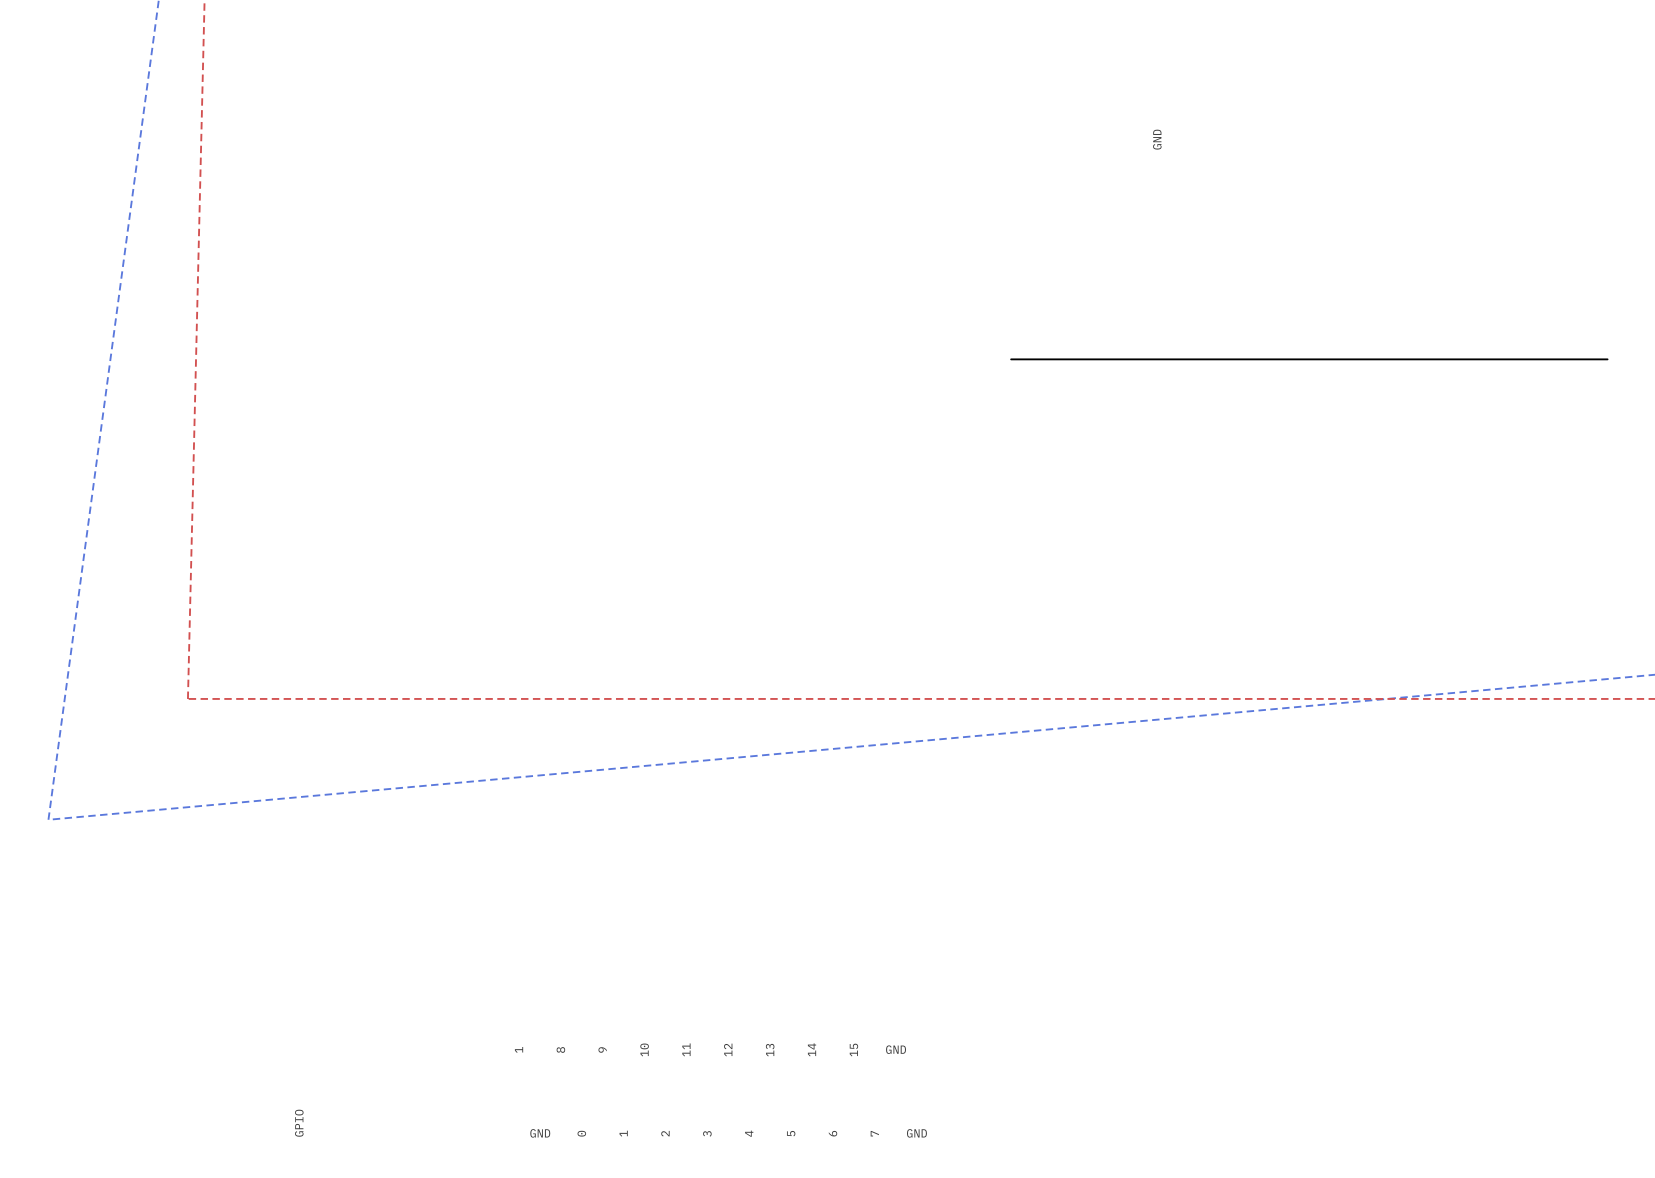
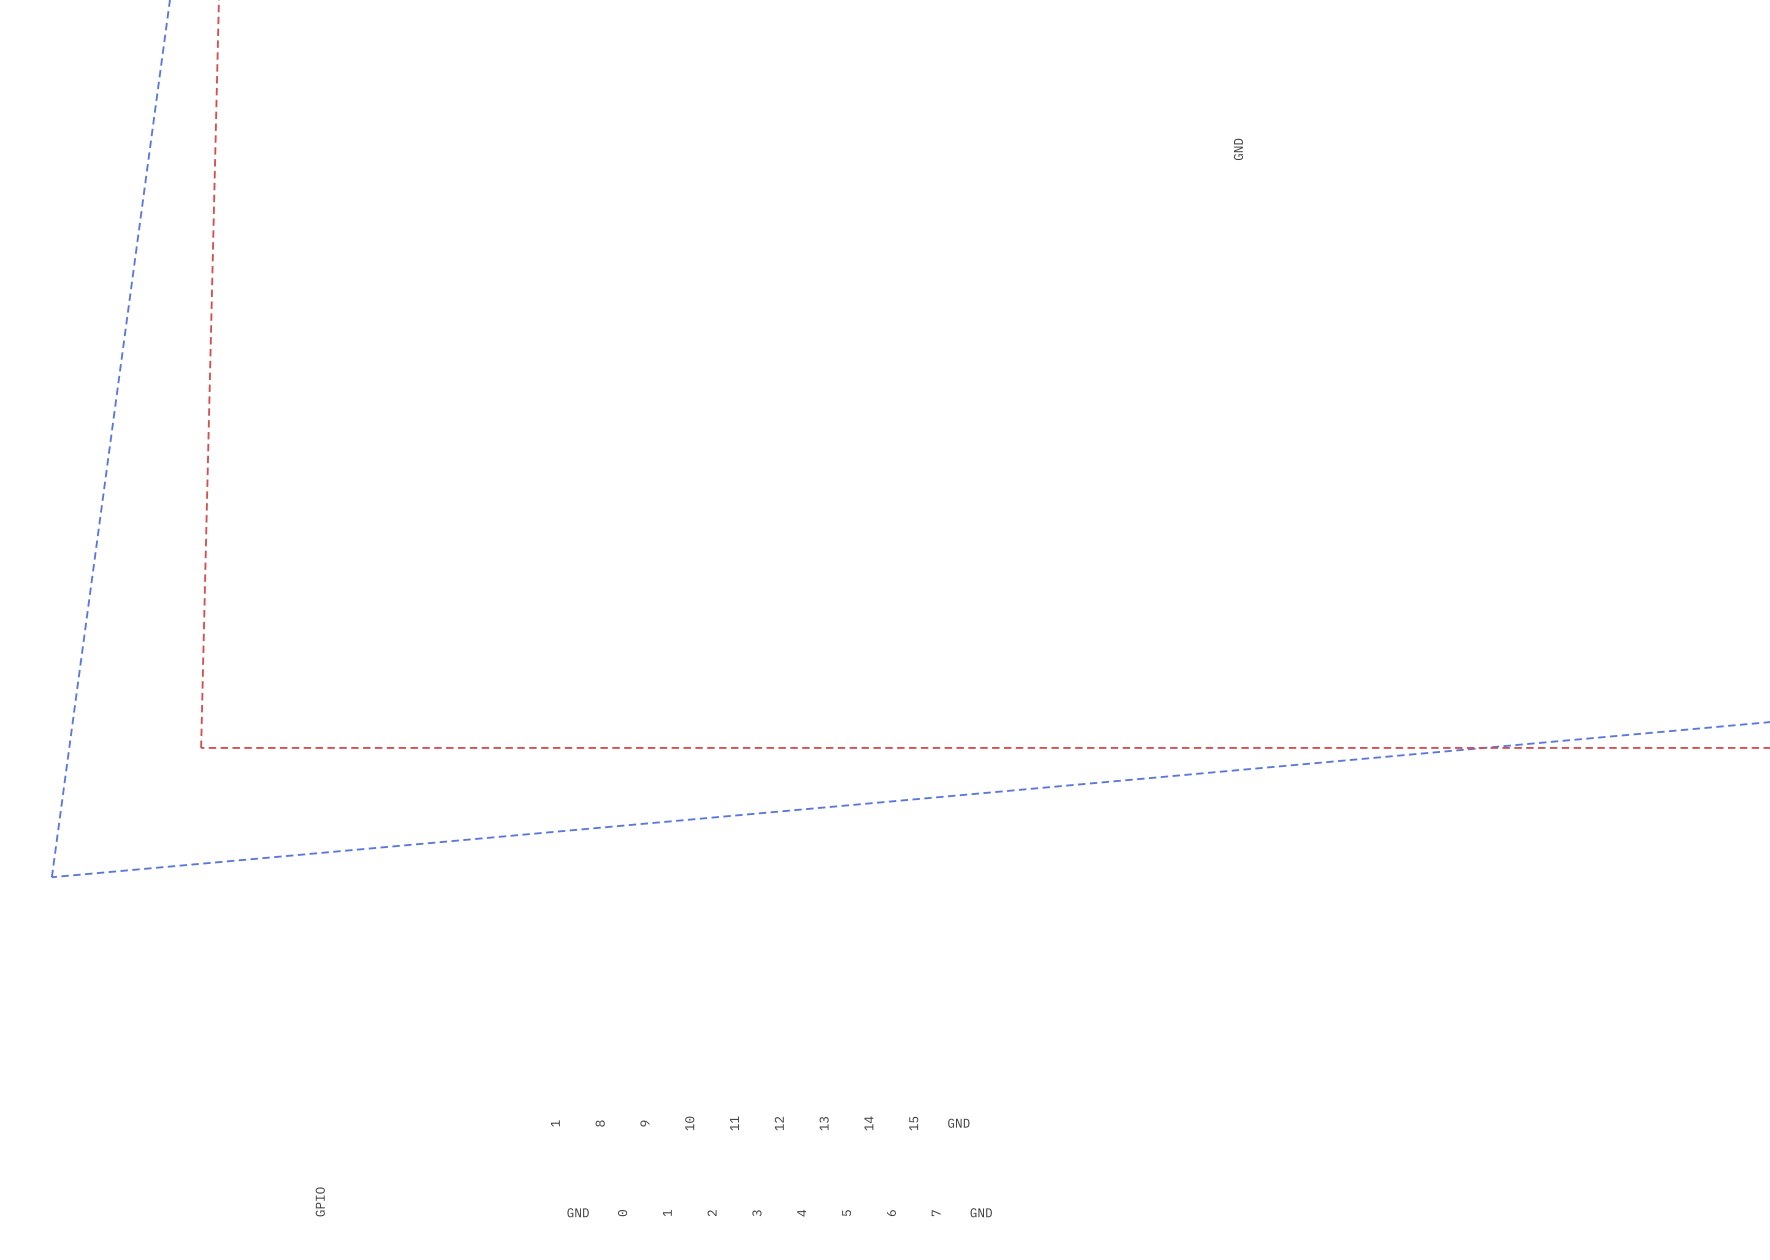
board edge: (1011, 359) (1607, 359) -> none

